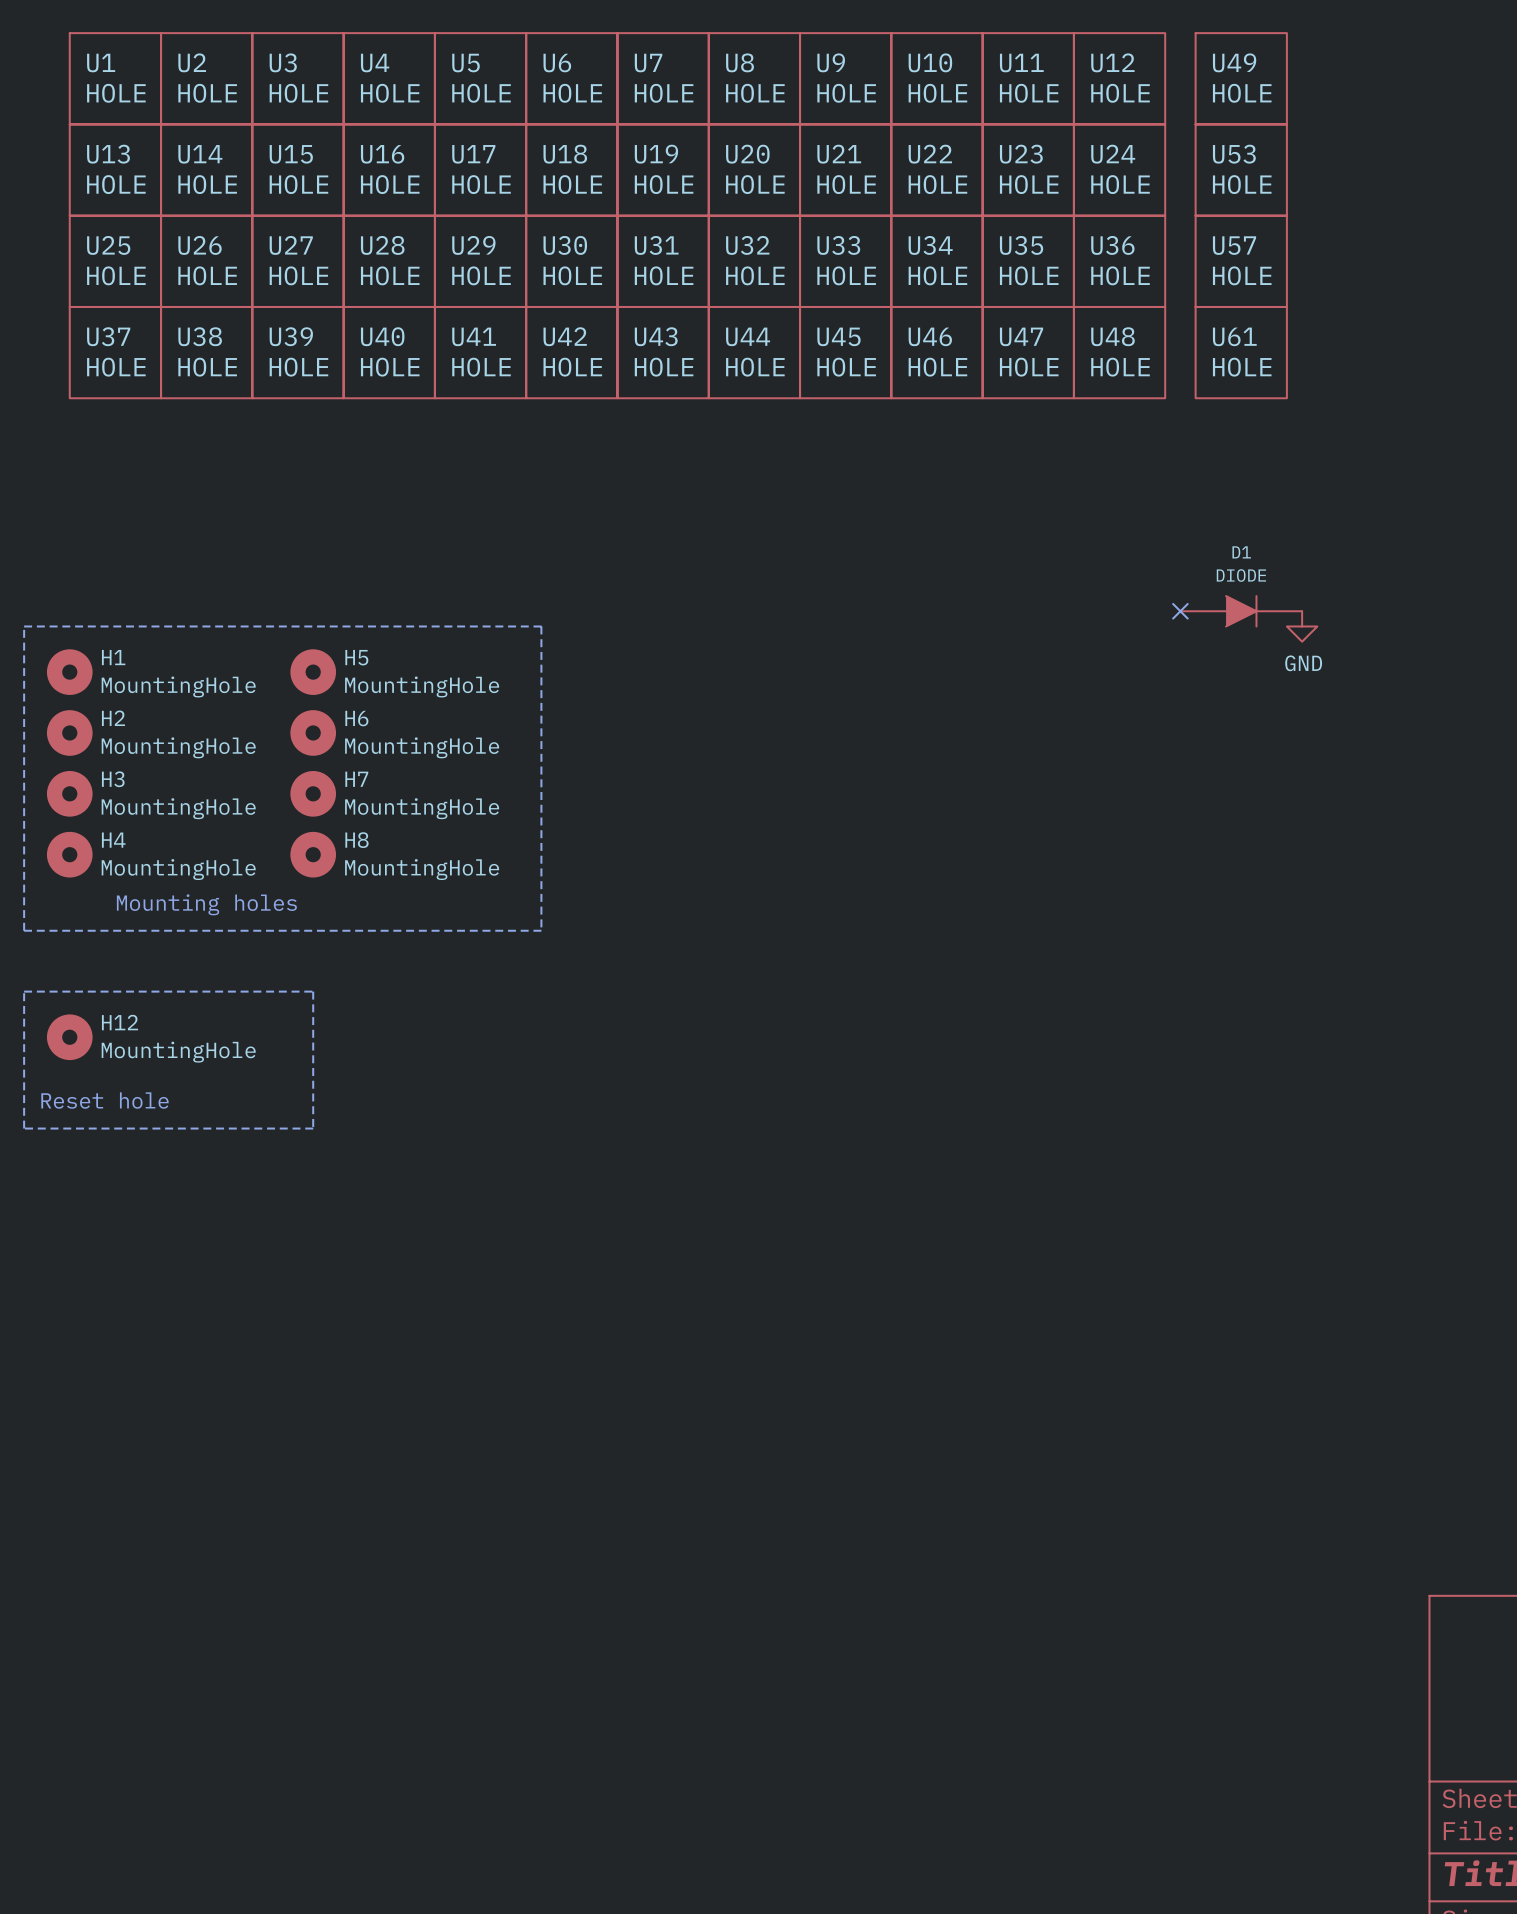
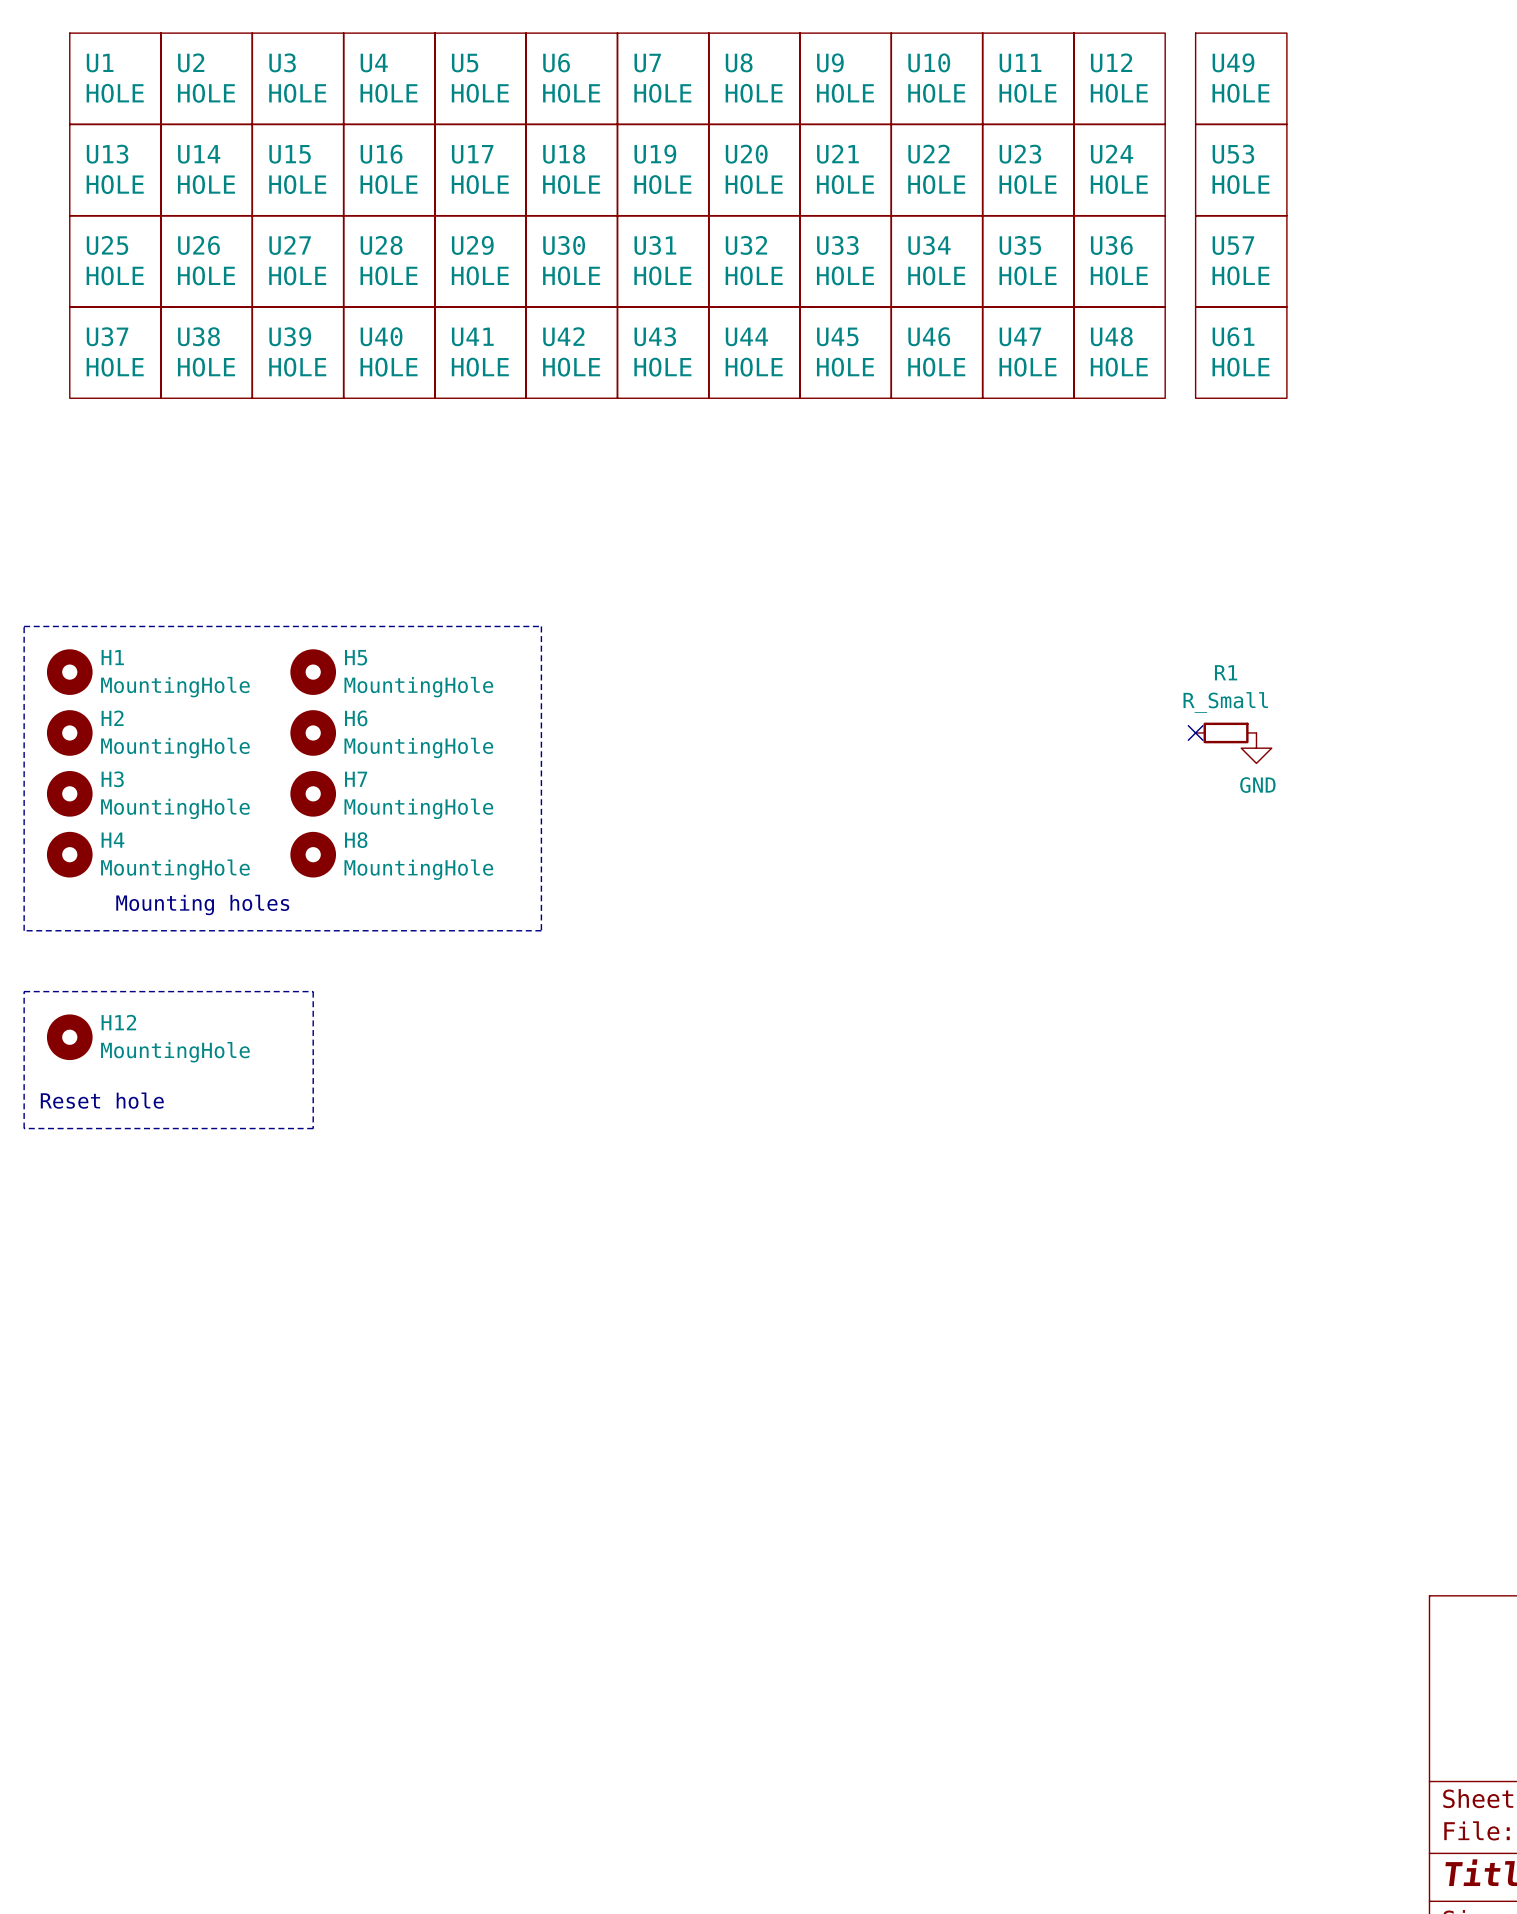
no-connect mark: (1180, 611) -> none
D1: DIODE (1241, 611) -> none
power symbol position: GND (1302, 626) -> GND (1256, 748)
no-connect mark: none -> (1195, 732)
R1: none -> R_Small (1226, 732)

